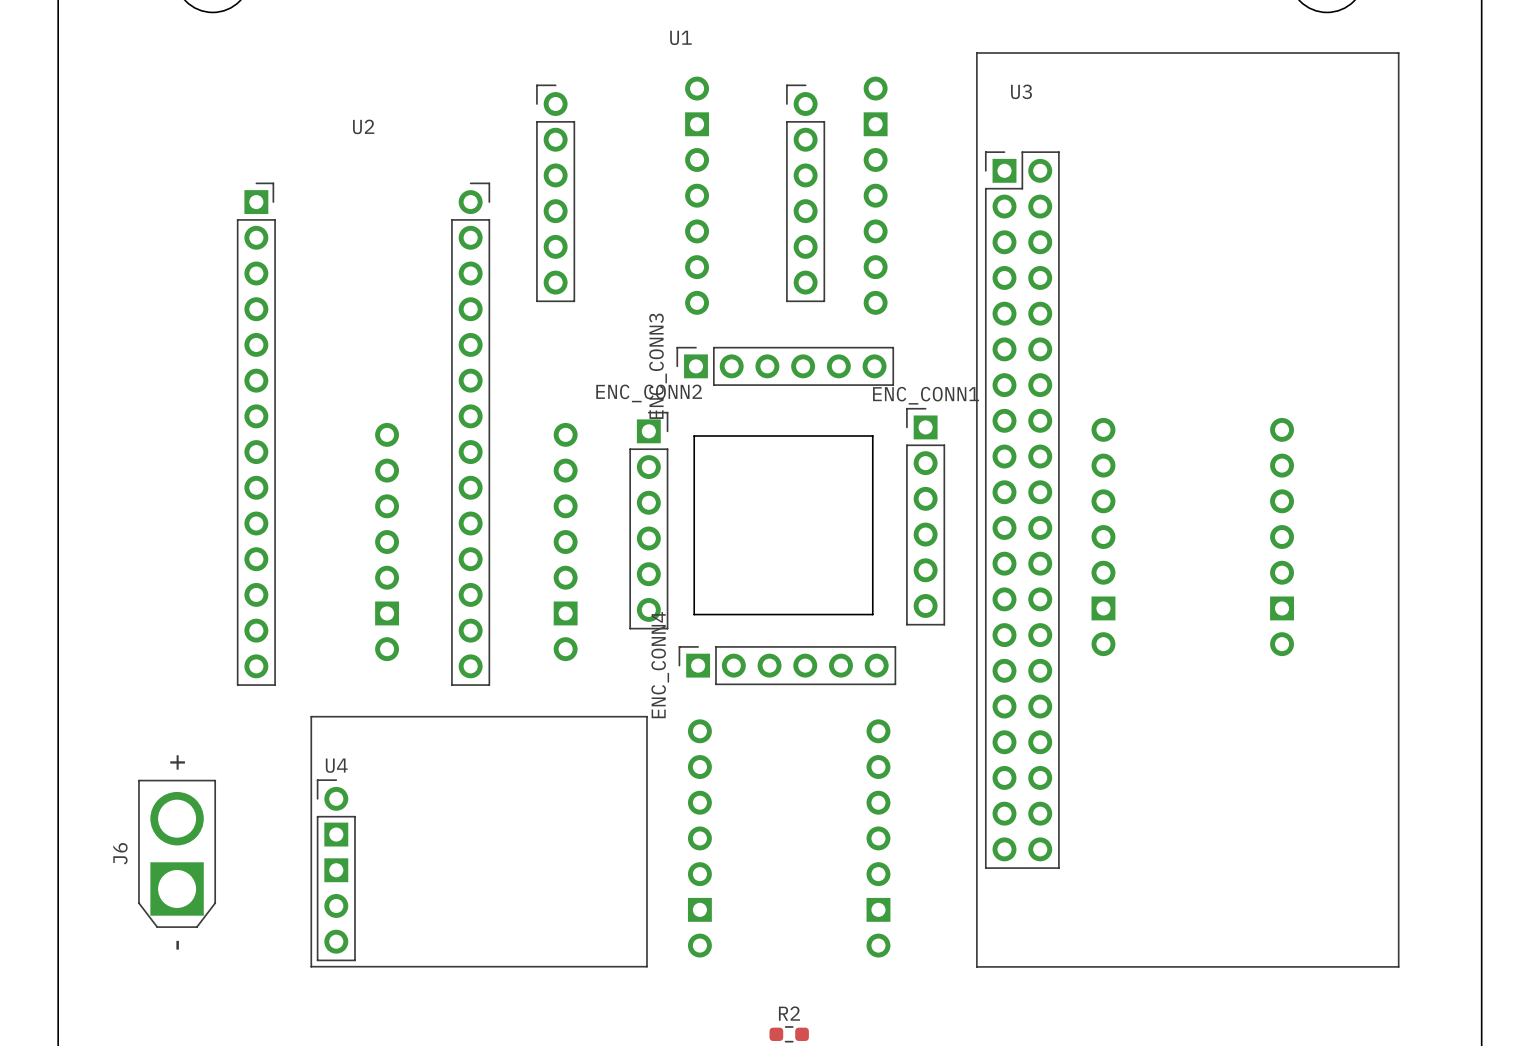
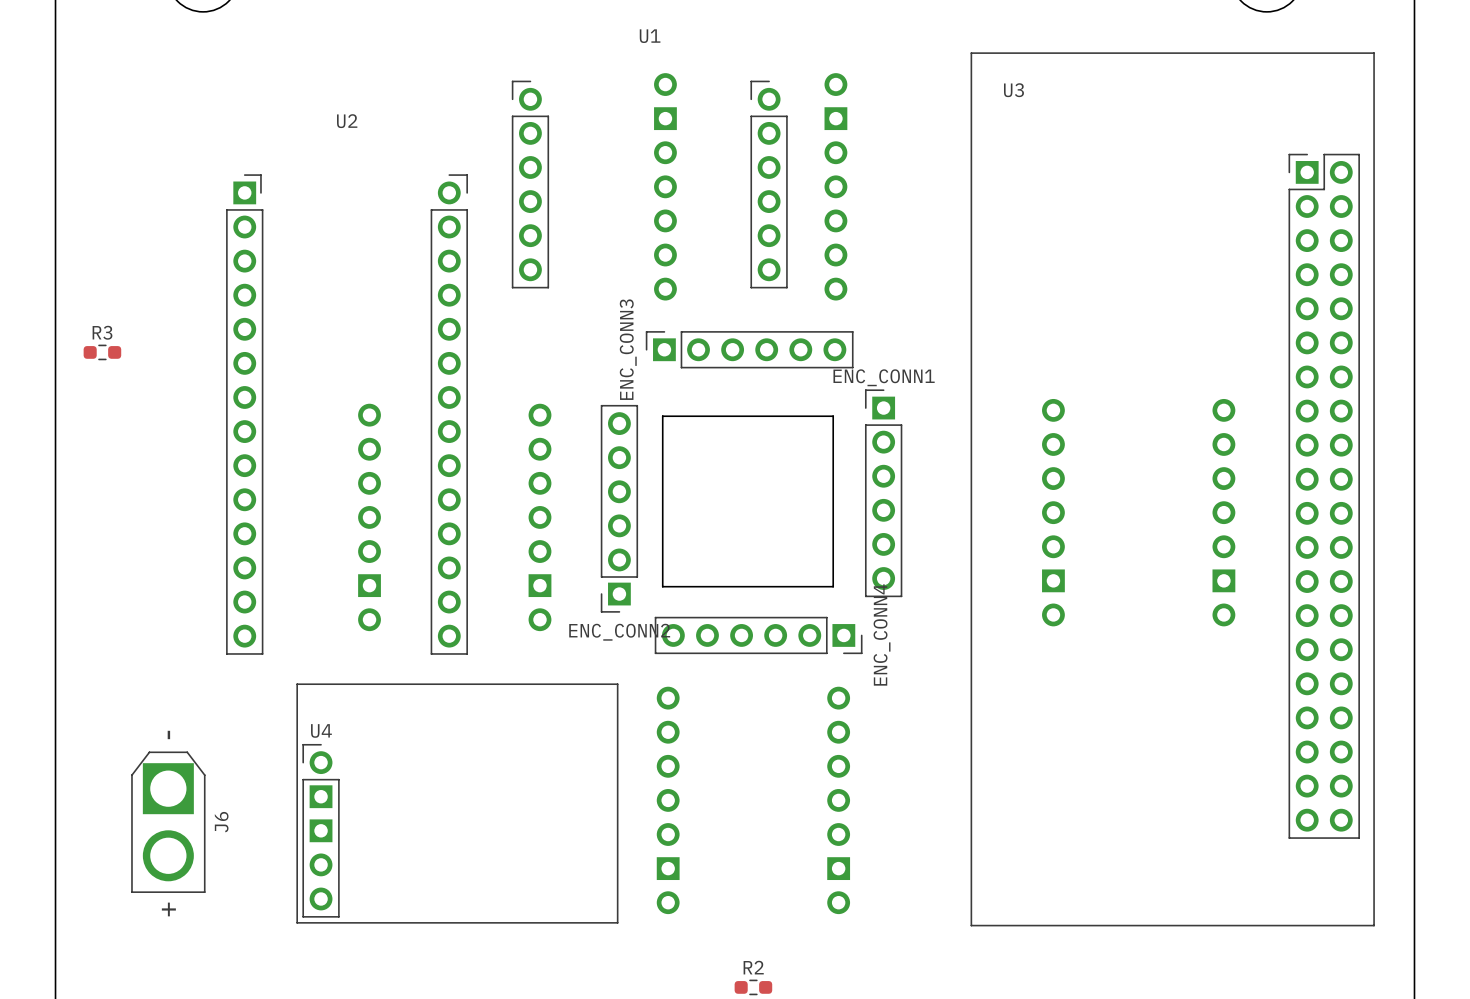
U3 footprint: [976, 52, 1400, 968] -> [970, 52, 1375, 927]
R3: none -> (102, 352)
ENC_CONN2 rotation: 0° (648, 520) -> 180° (619, 508)
ENC_CONN4 rotation: 0° (787, 665) -> 180° (758, 635)
J6 rotation: 0° (177, 853) -> 180° (168, 822)

